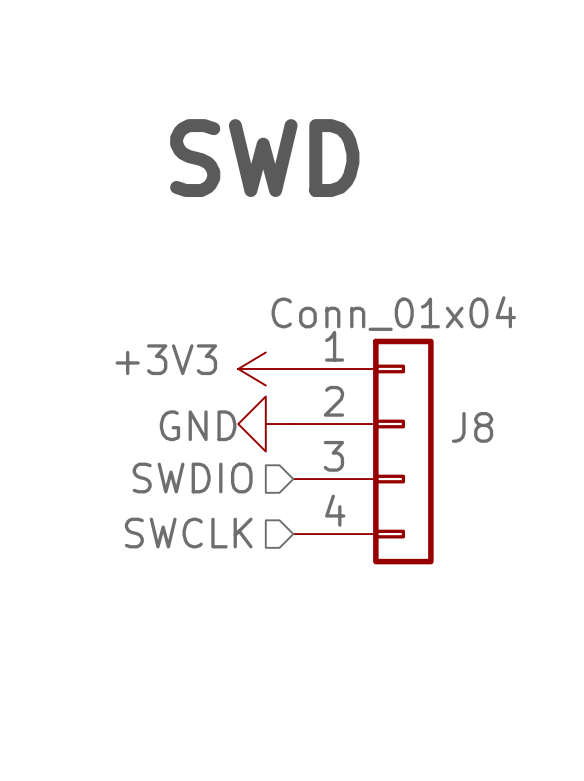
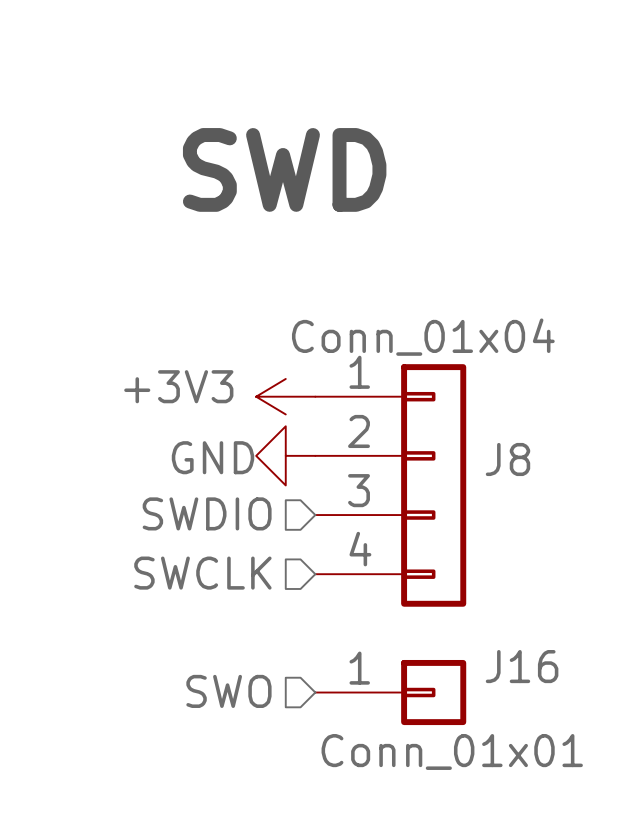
hierarchical label: none -> SWO (228, 691)
J16: none -> Conn_01x01 (390, 692)

